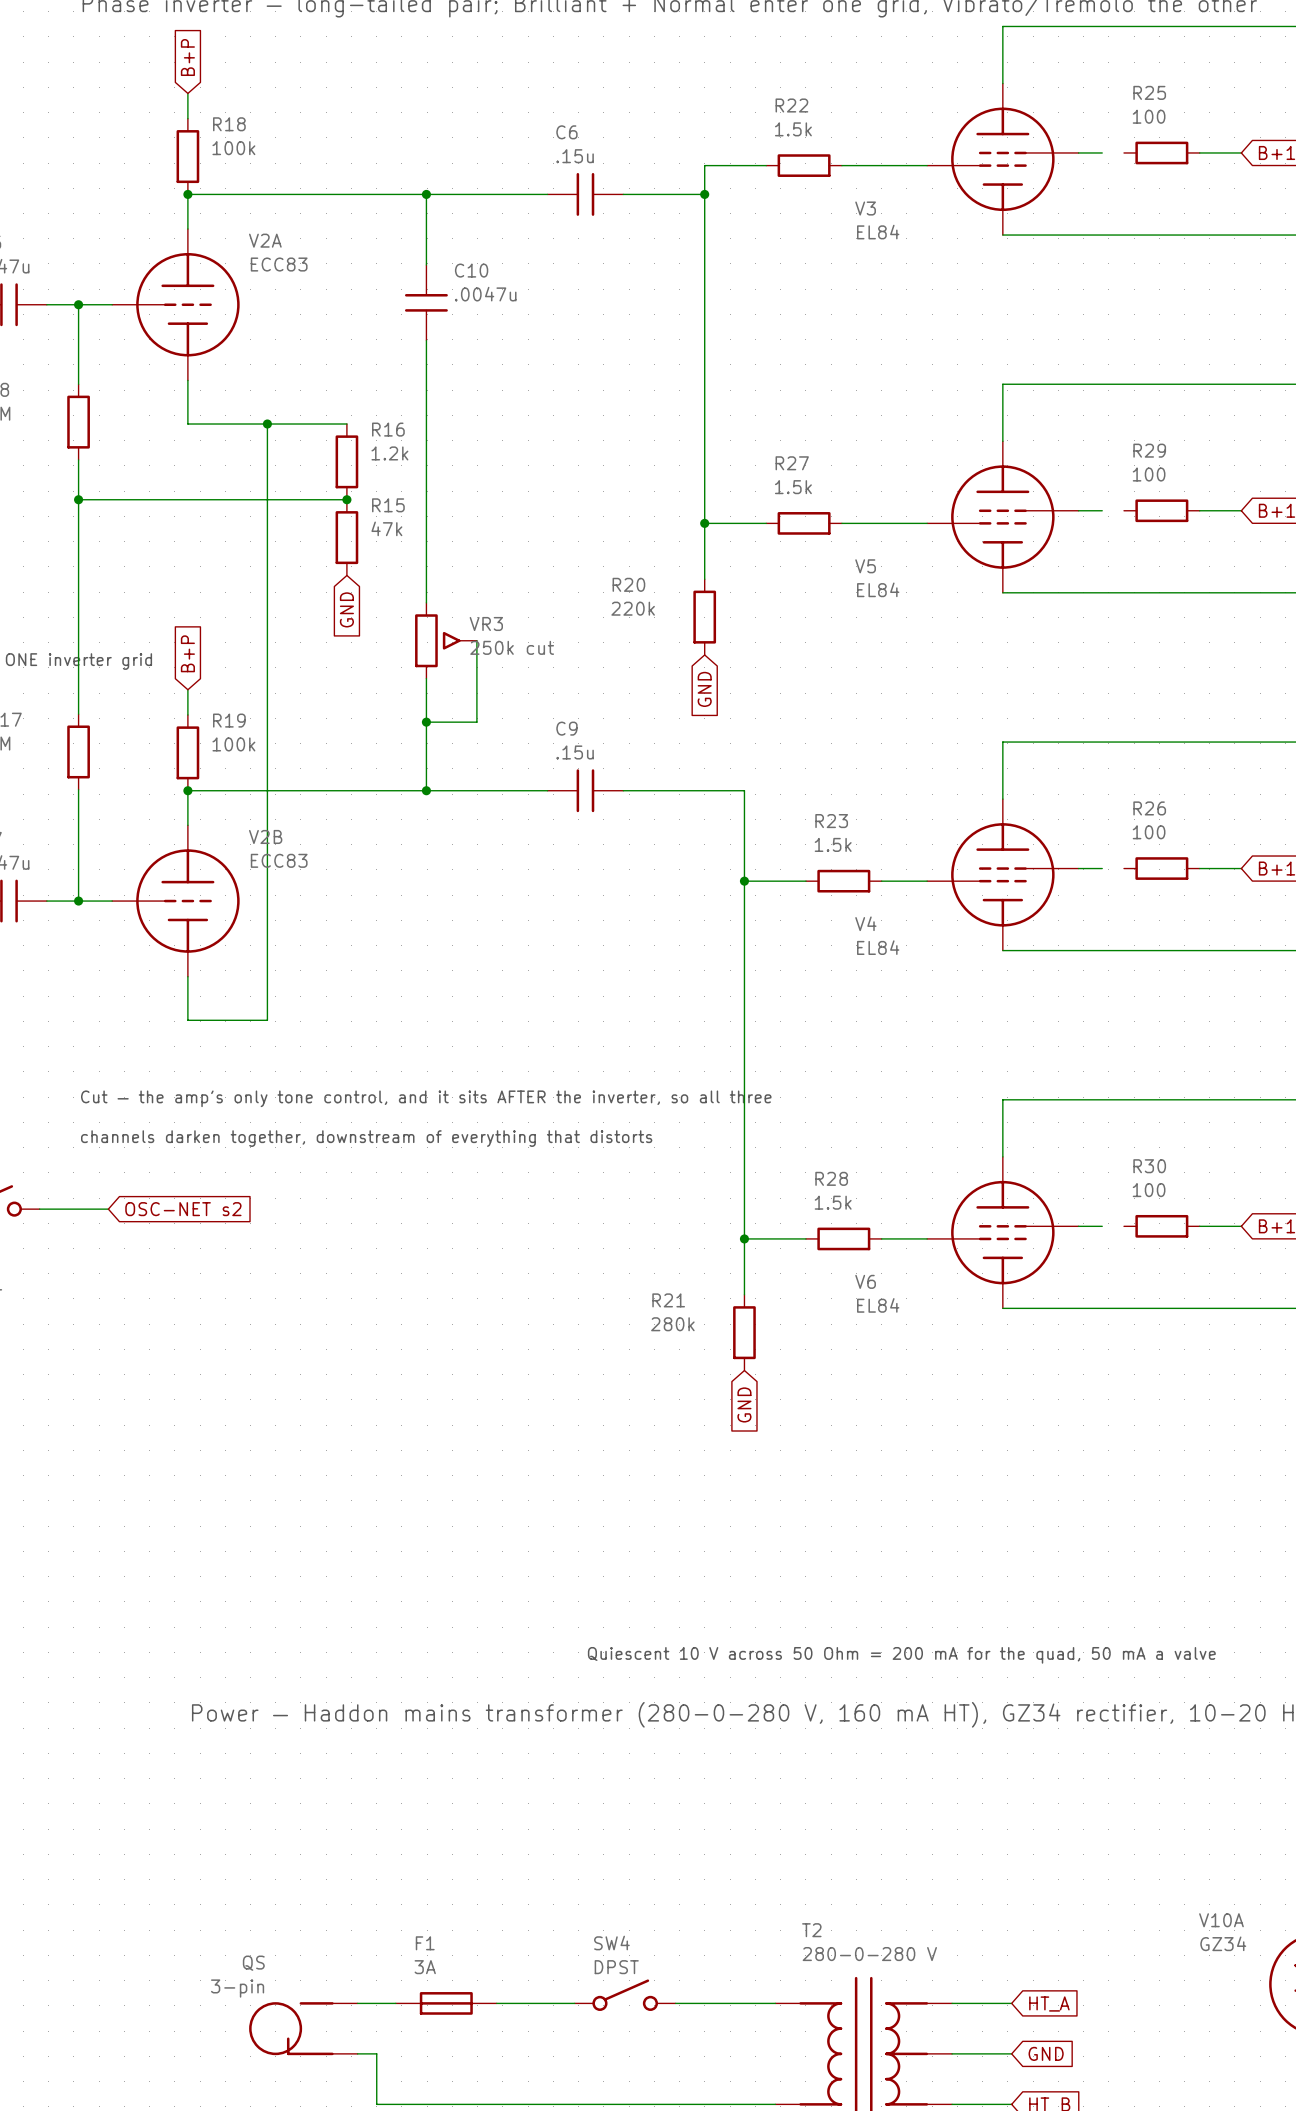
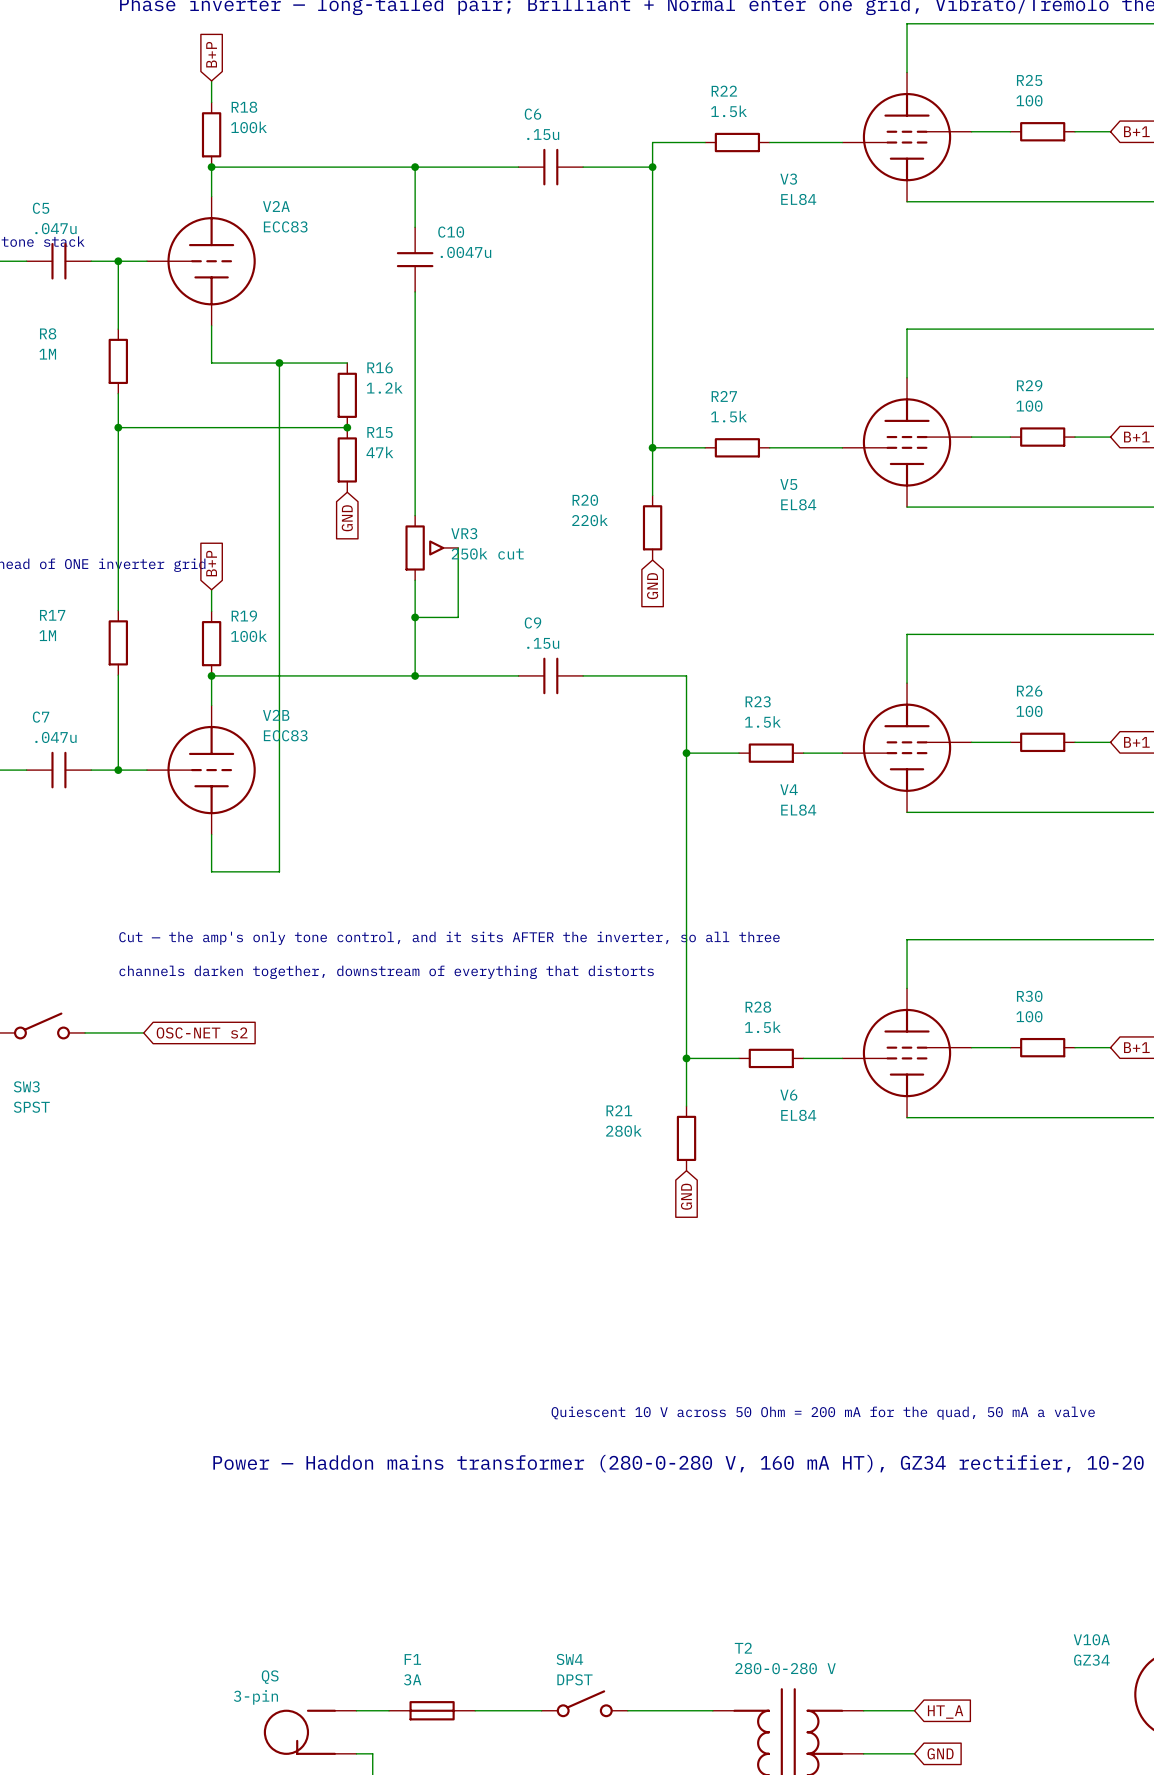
wire: none -> (991, 131) (1010, 131)
wire: none -> (991, 437) (1010, 437)
wire: none -> (991, 742) (1010, 742)
wire: none -> (991, 1047) (1010, 1047)

